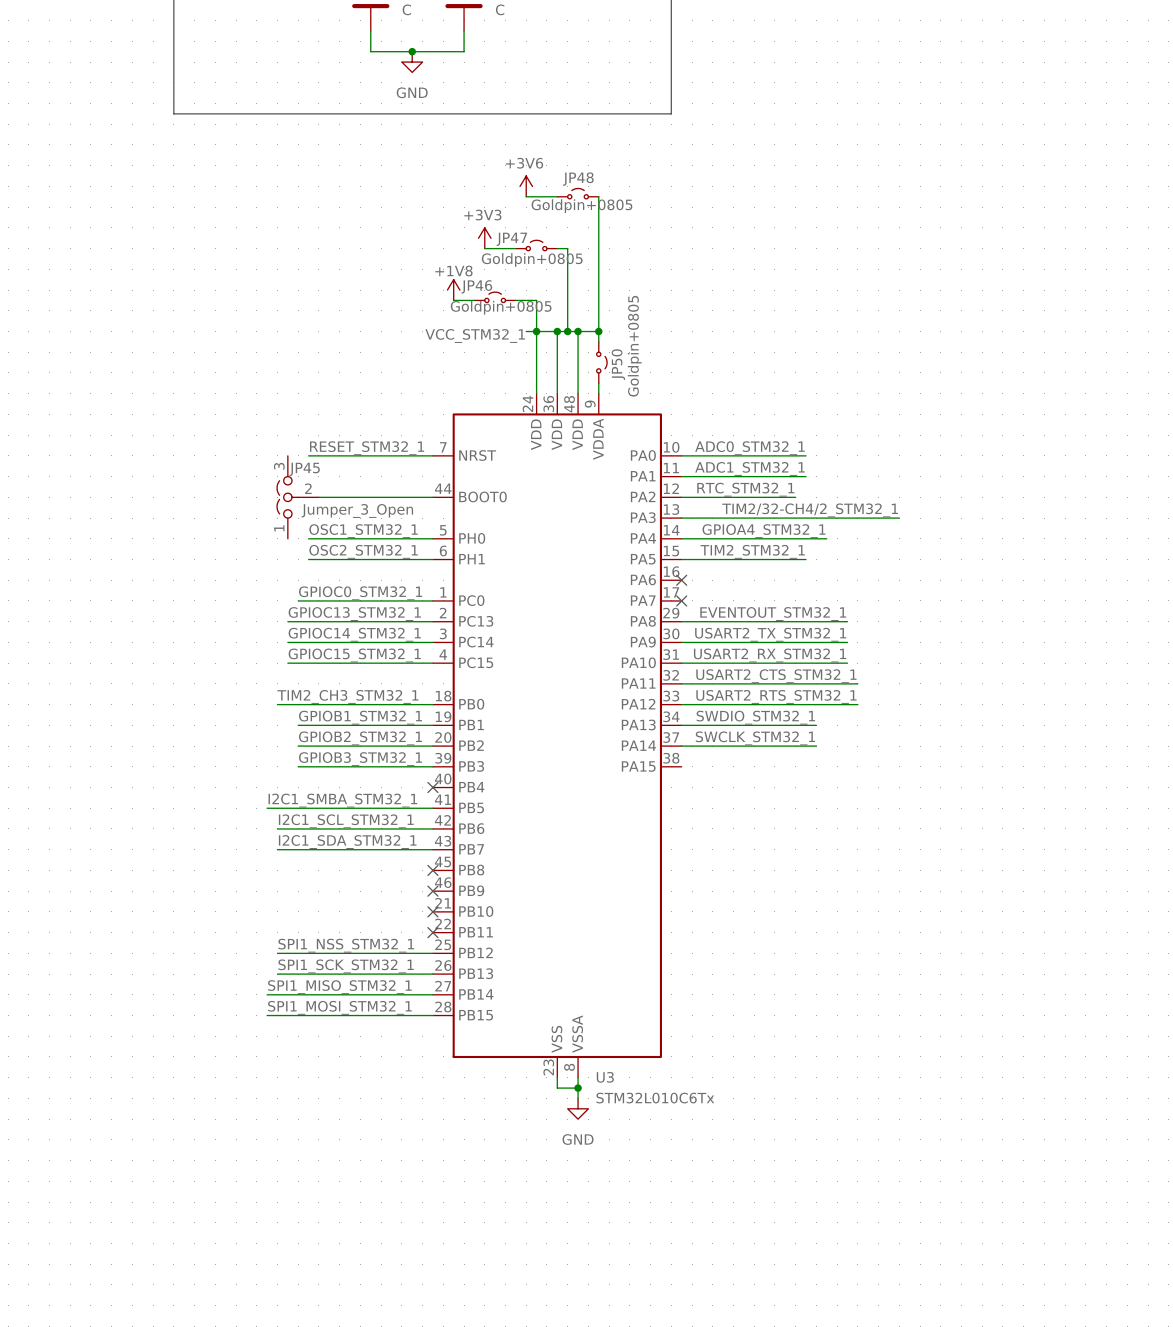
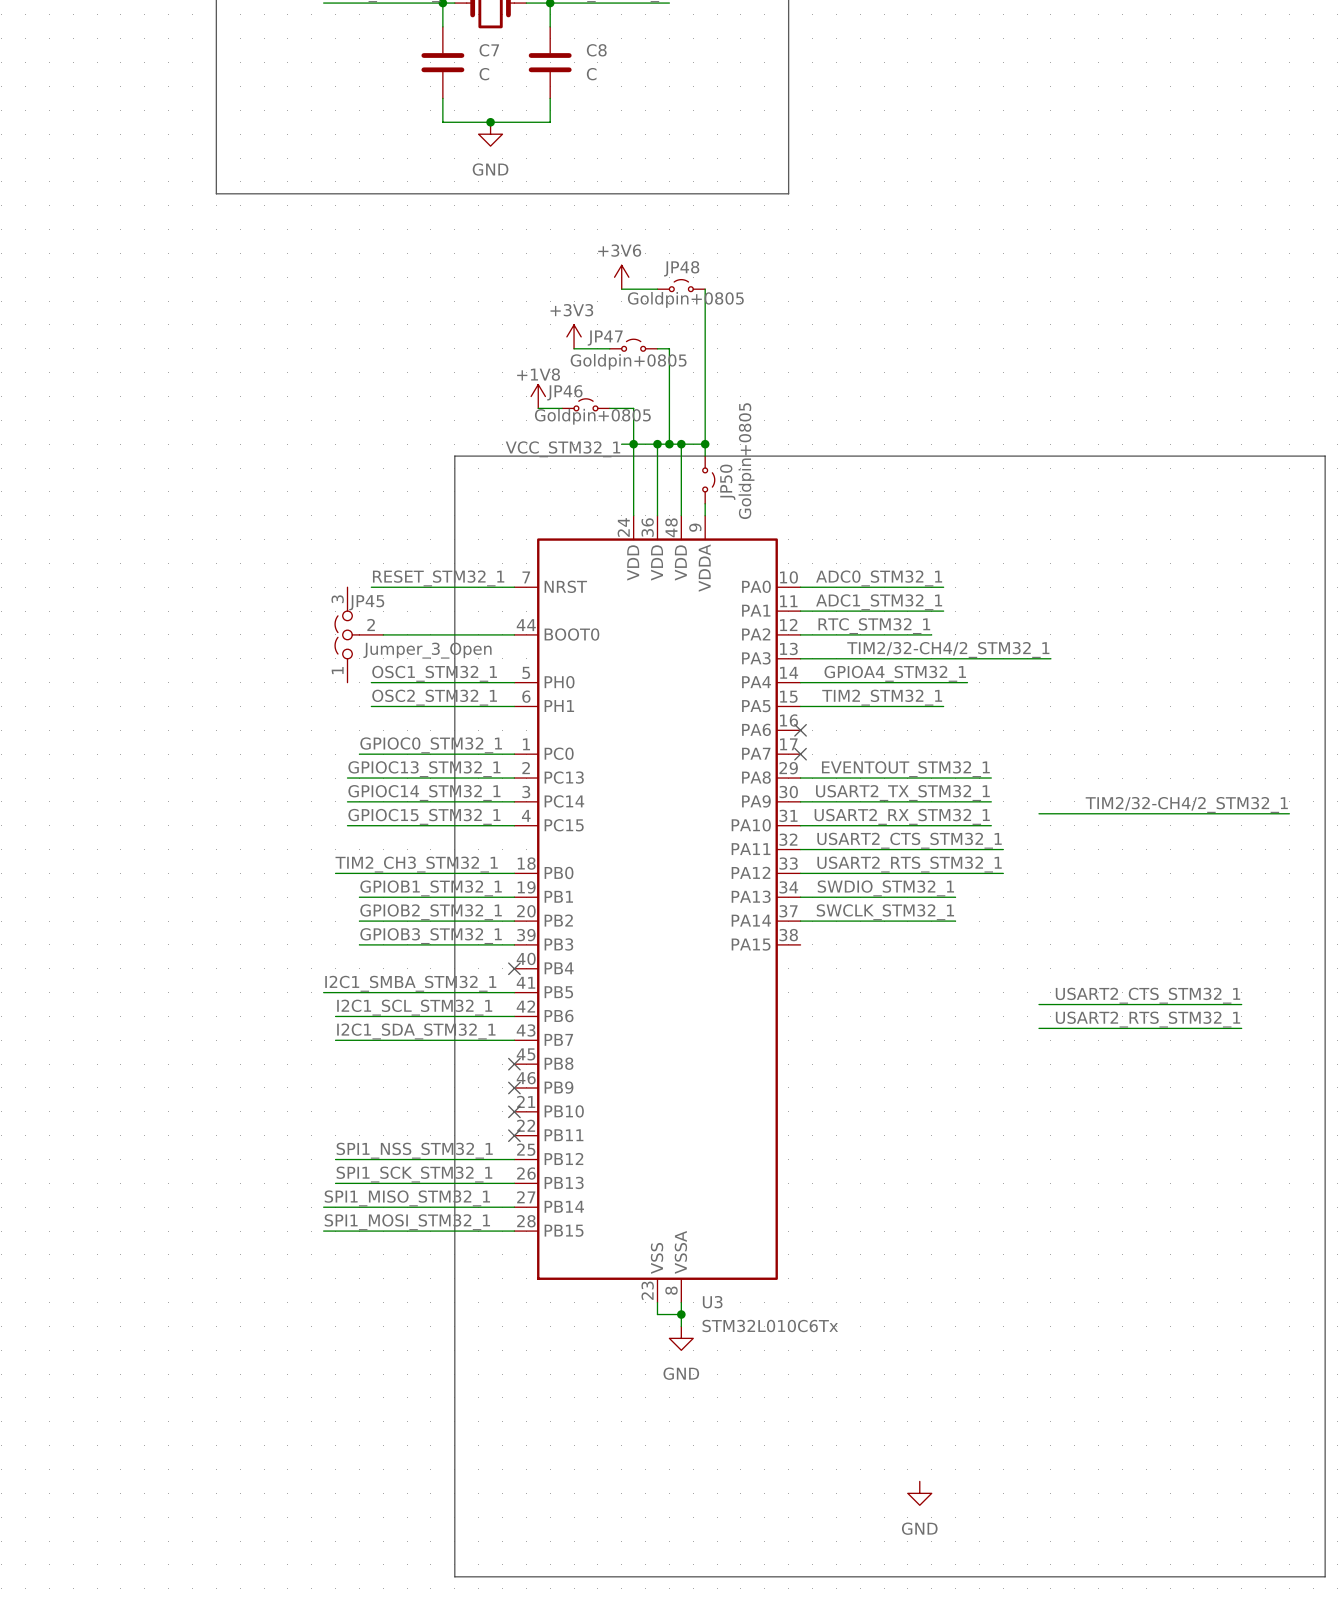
line: none -> (454, 456) (1325, 456) (1325, 1576) (454, 1576) (454, 456)
label: none -> TIM2/32-CH4/2_STM32_1 (1186, 804)
wire: none -> (1039, 813) (1289, 813)
label: none -> USART2_CTS_STM32_1 (1147, 995)
wire: none -> (1039, 1004) (1241, 1004)
label: none -> USART2_RTS_STM32_1 (1148, 1019)
wire: none -> (1039, 1028) (1241, 1028)
power symbol: none -> GND (919, 1493)

